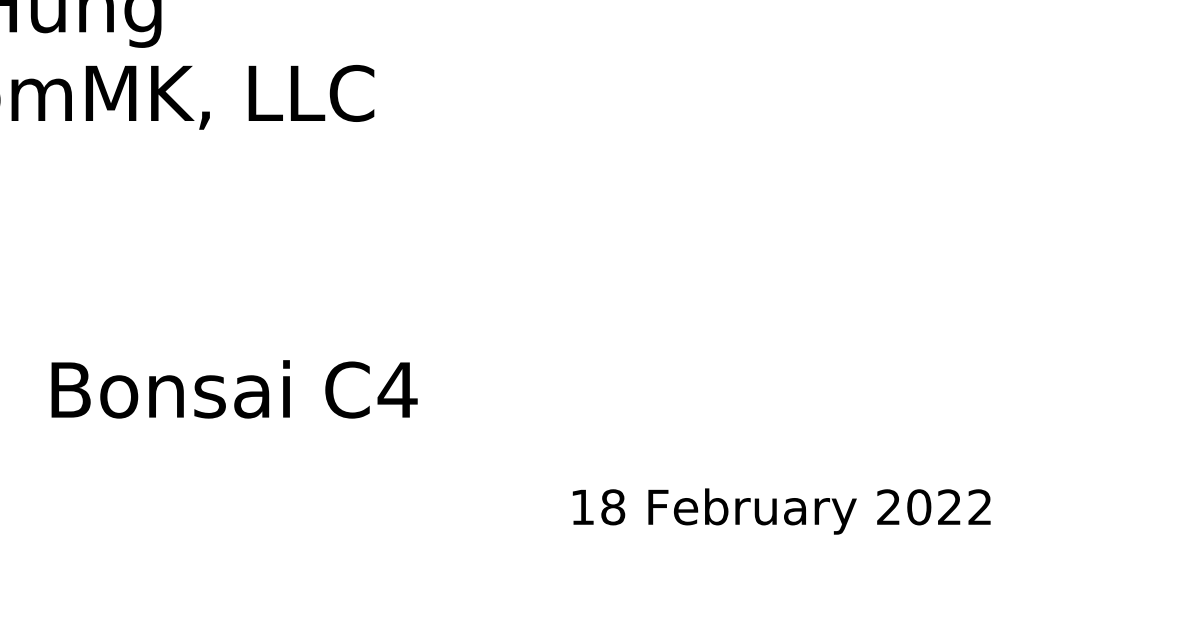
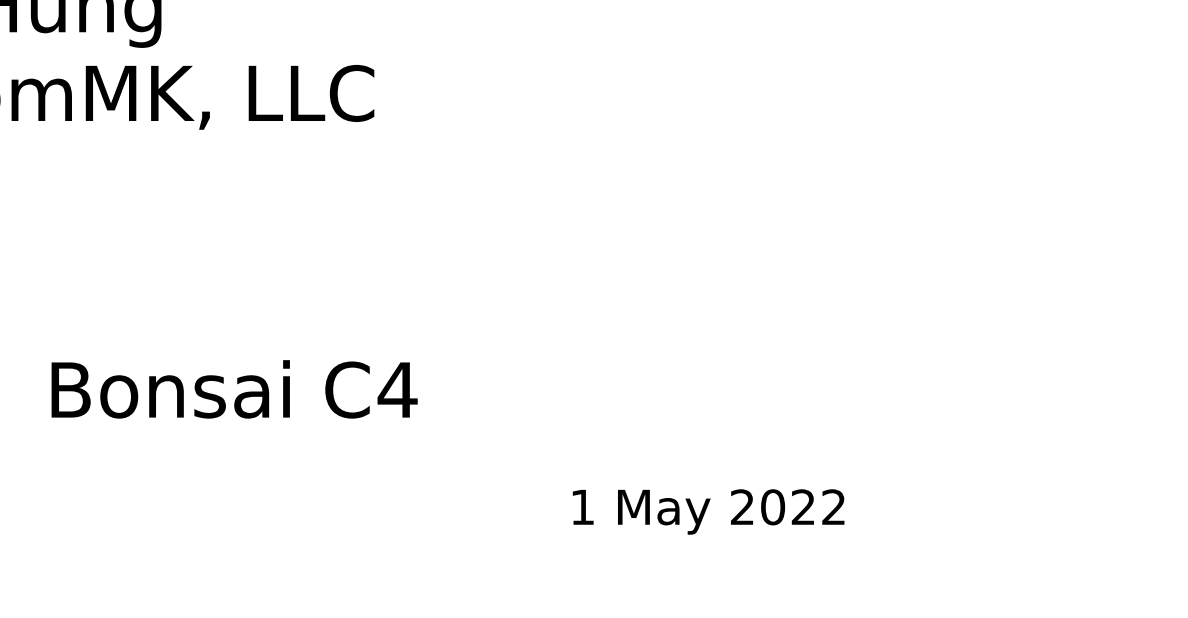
text: 18 February 2022 (781, 511) -> 1 May 2022 (708, 511)

